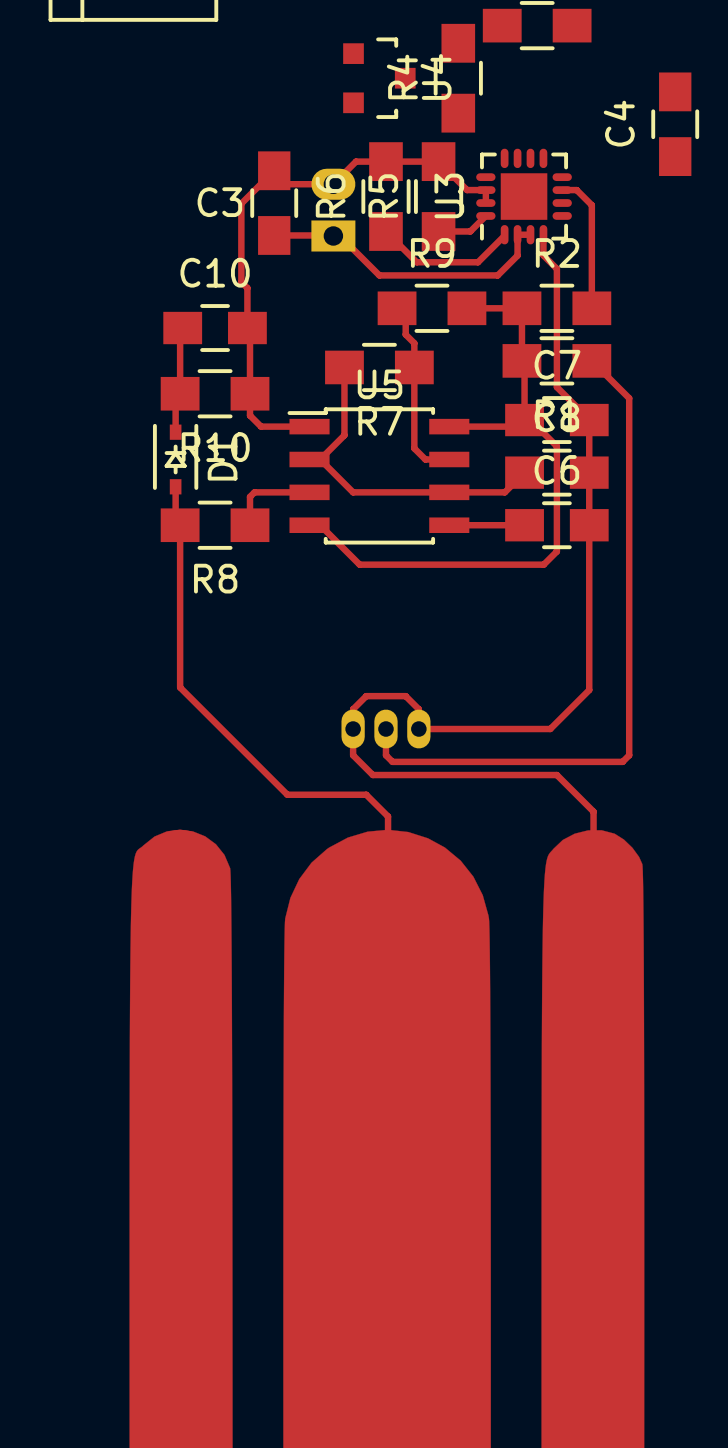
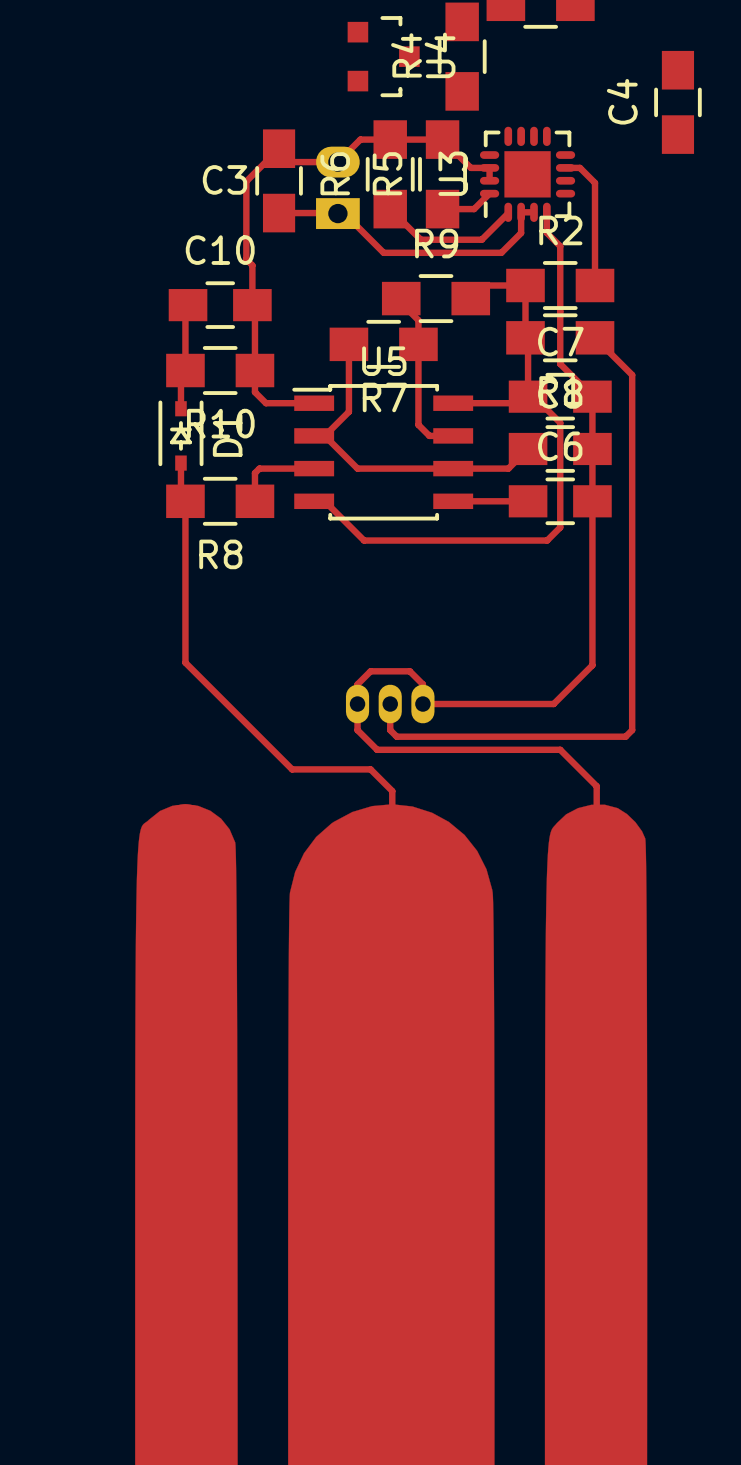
R9 position: (432, 308) -> (436, 298)

